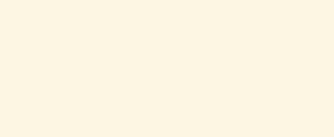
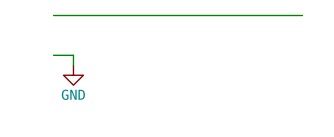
wire: none -> (53, 15) (302, 15)
wire: none -> (53, 55) (73, 55) (73, 65)
power symbol: none -> GND (73, 75)

